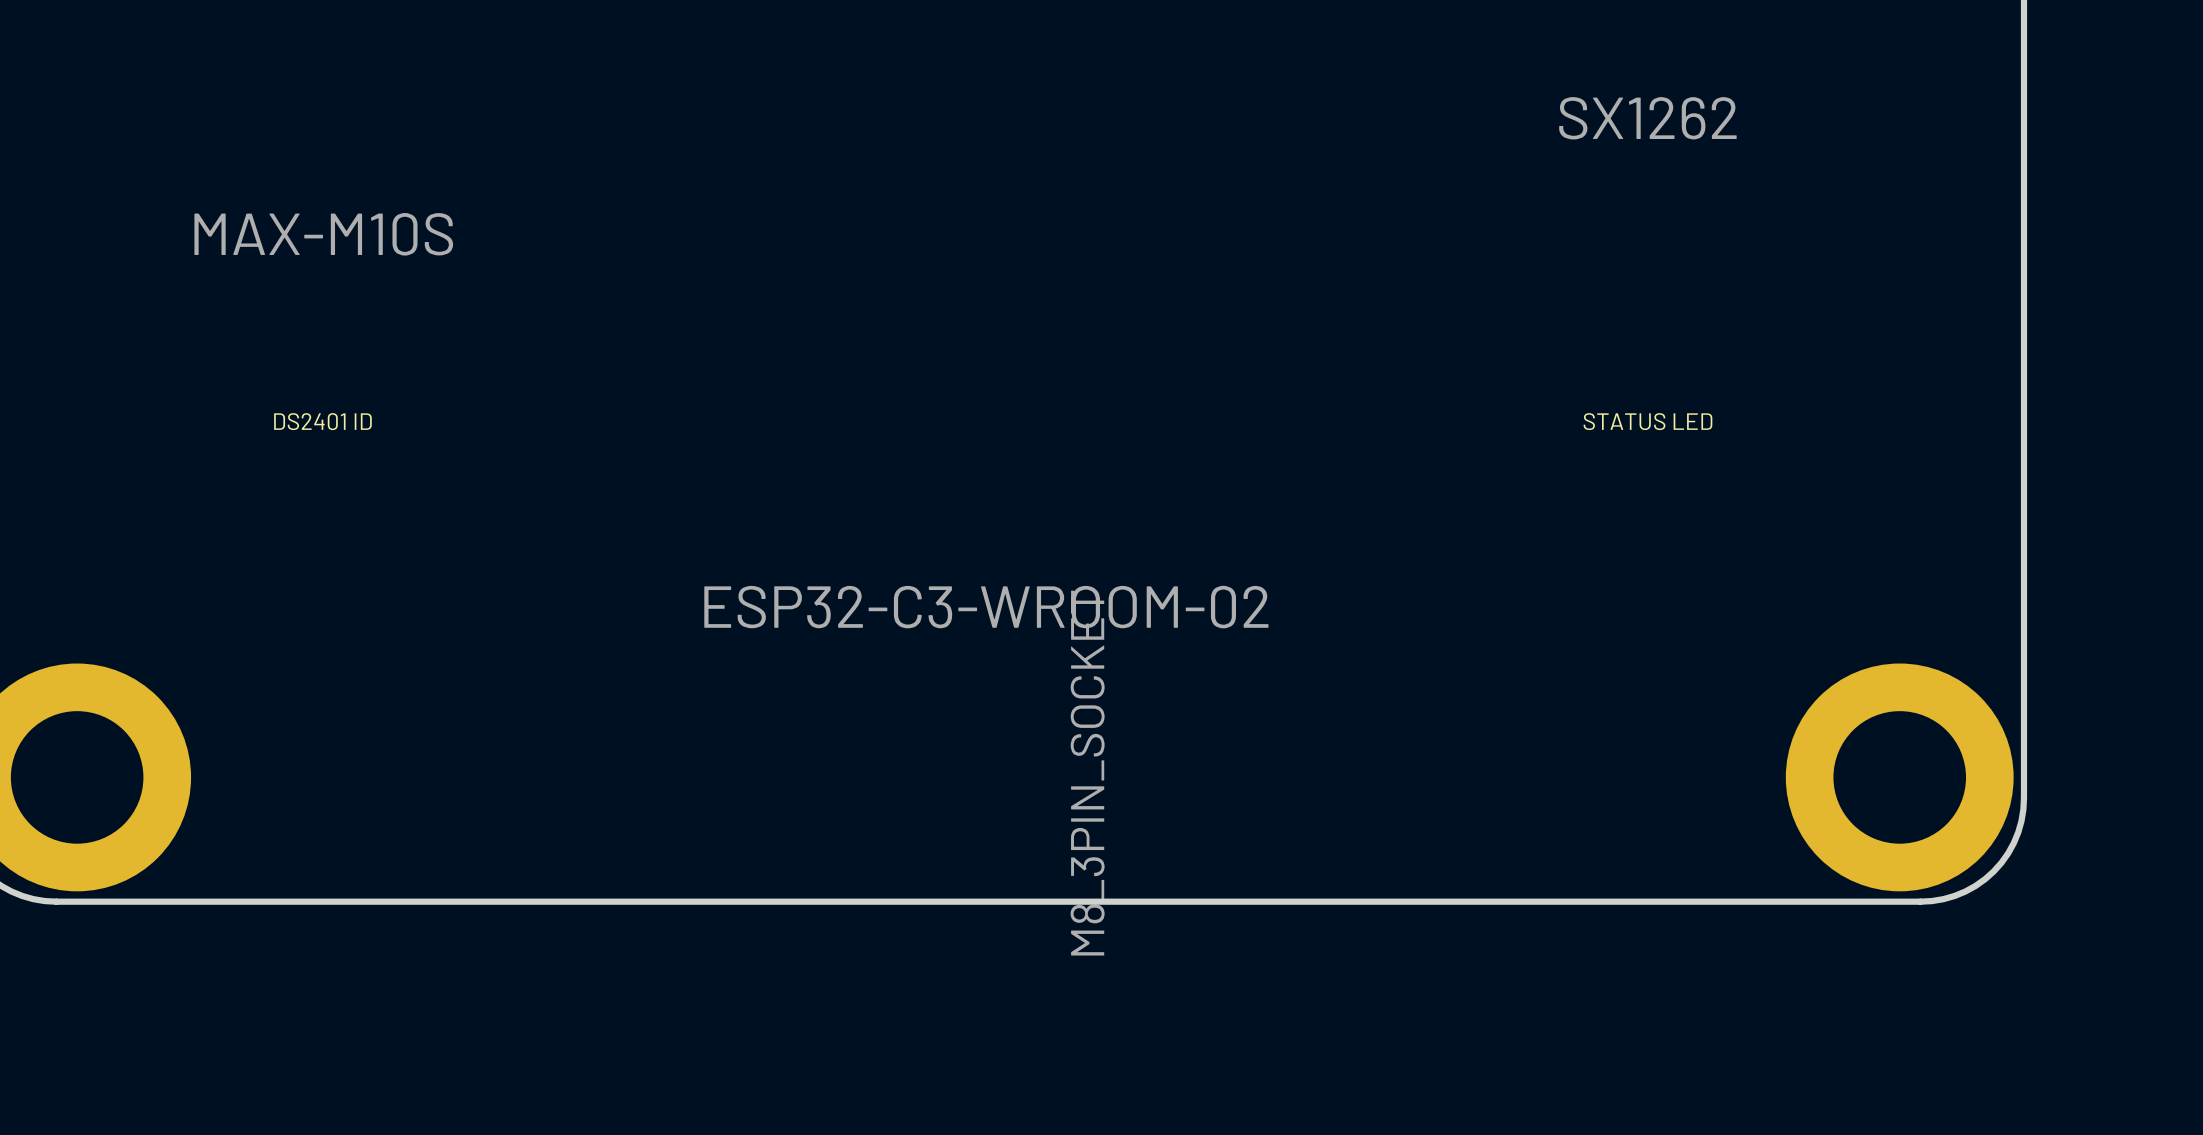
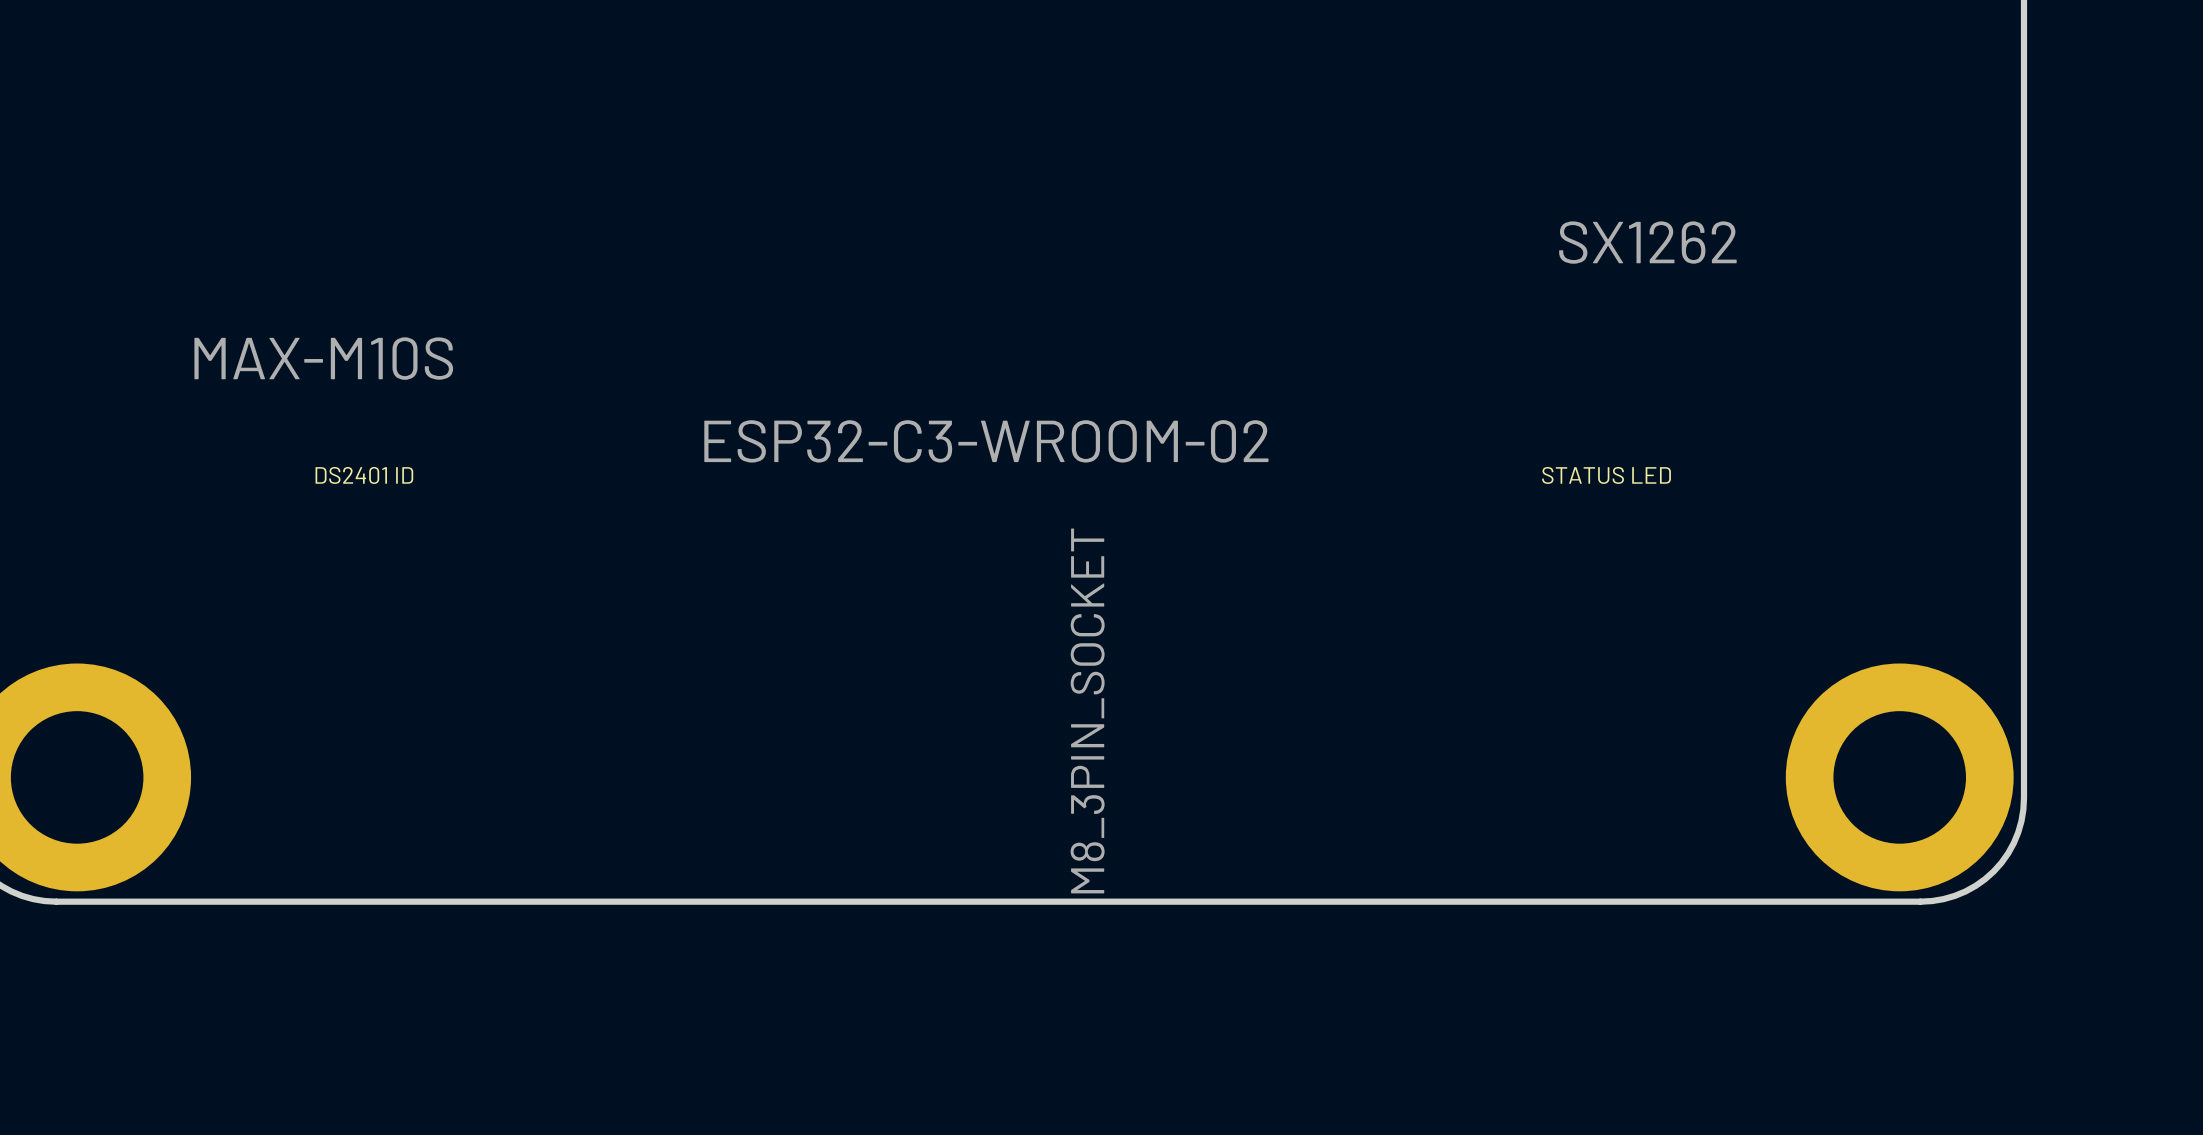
drawing position: (1647, 118) -> (1647, 242)
drawing position: (323, 234) -> (323, 358)
text position: DS2401 ID (322, 421) -> DS2401 ID (364, 475)
text position: STATUS LED (1647, 421) -> STATUS LED (1606, 475)
drawing position: (986, 607) -> (986, 441)
drawing position: (1087, 773) -> (1087, 710)

